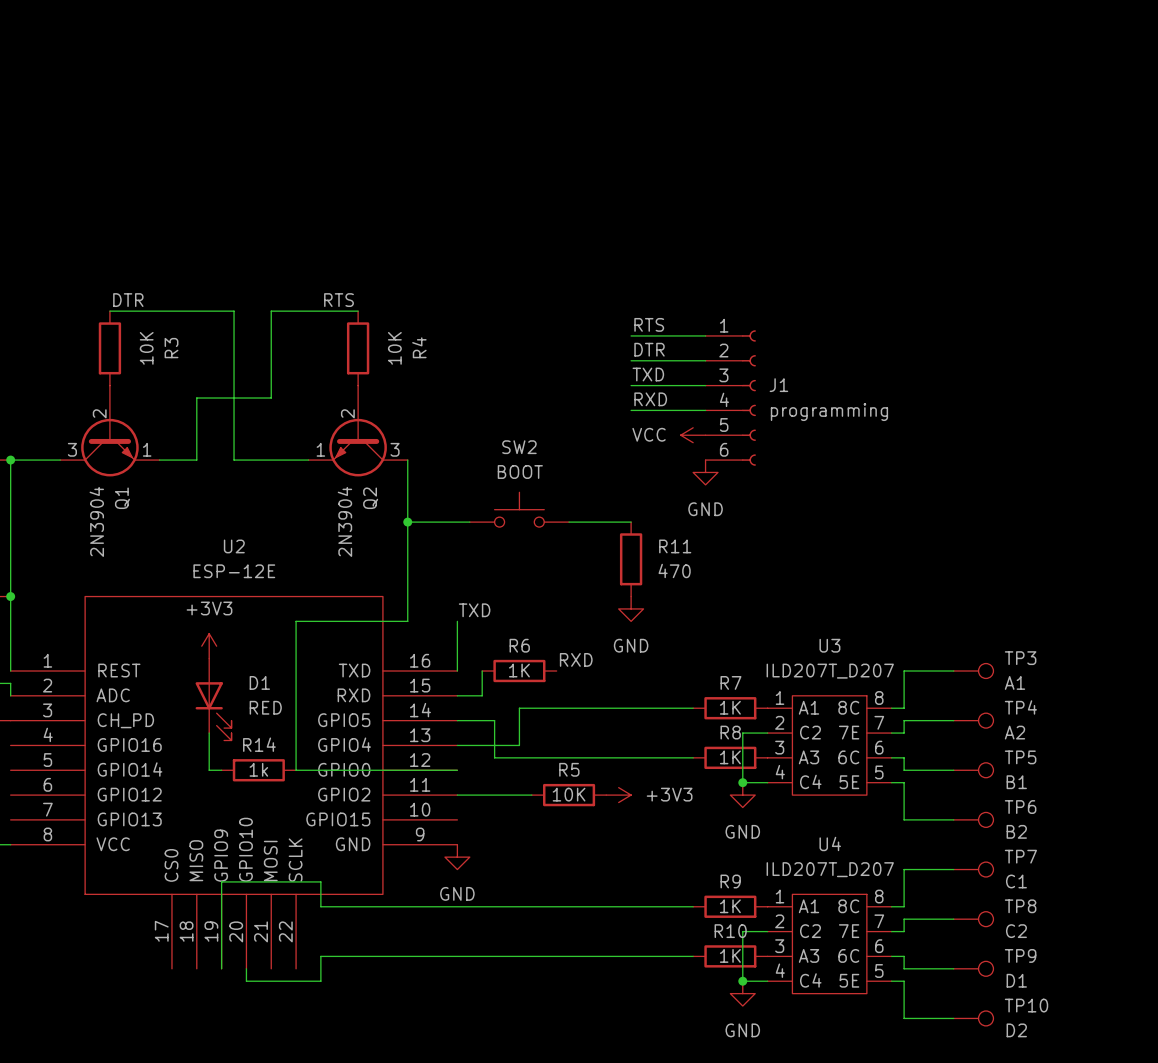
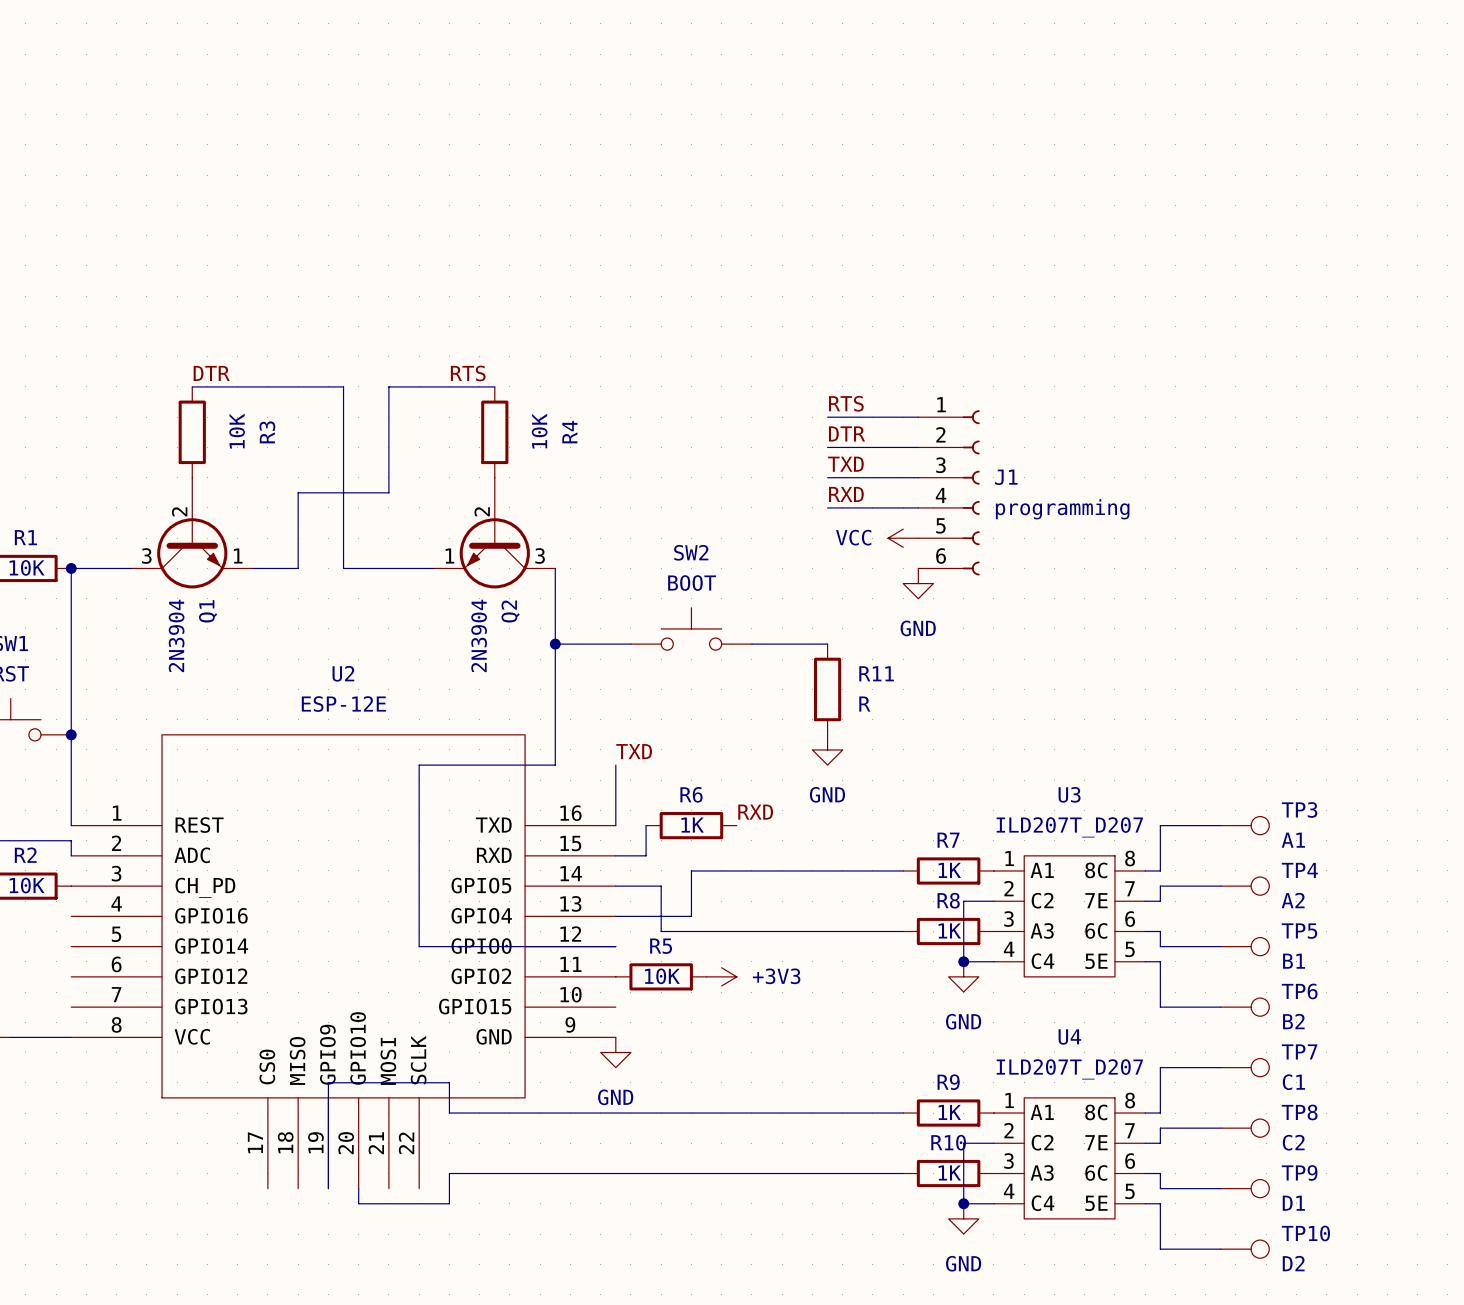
R11 value: 470 (674, 570) -> R (864, 704)
power symbol: +3V3 (209, 646) -> none
D1: RED (213, 699) -> none
wire: (209, 733) (209, 770) (221, 770) -> none
R14: 1k (258, 770) -> none
wire: (457, 795) (531, 795) -> none
R5 position: (569, 795) -> (661, 976)
power symbol position: +3V3 (618, 795) -> +3V3 (721, 976)

